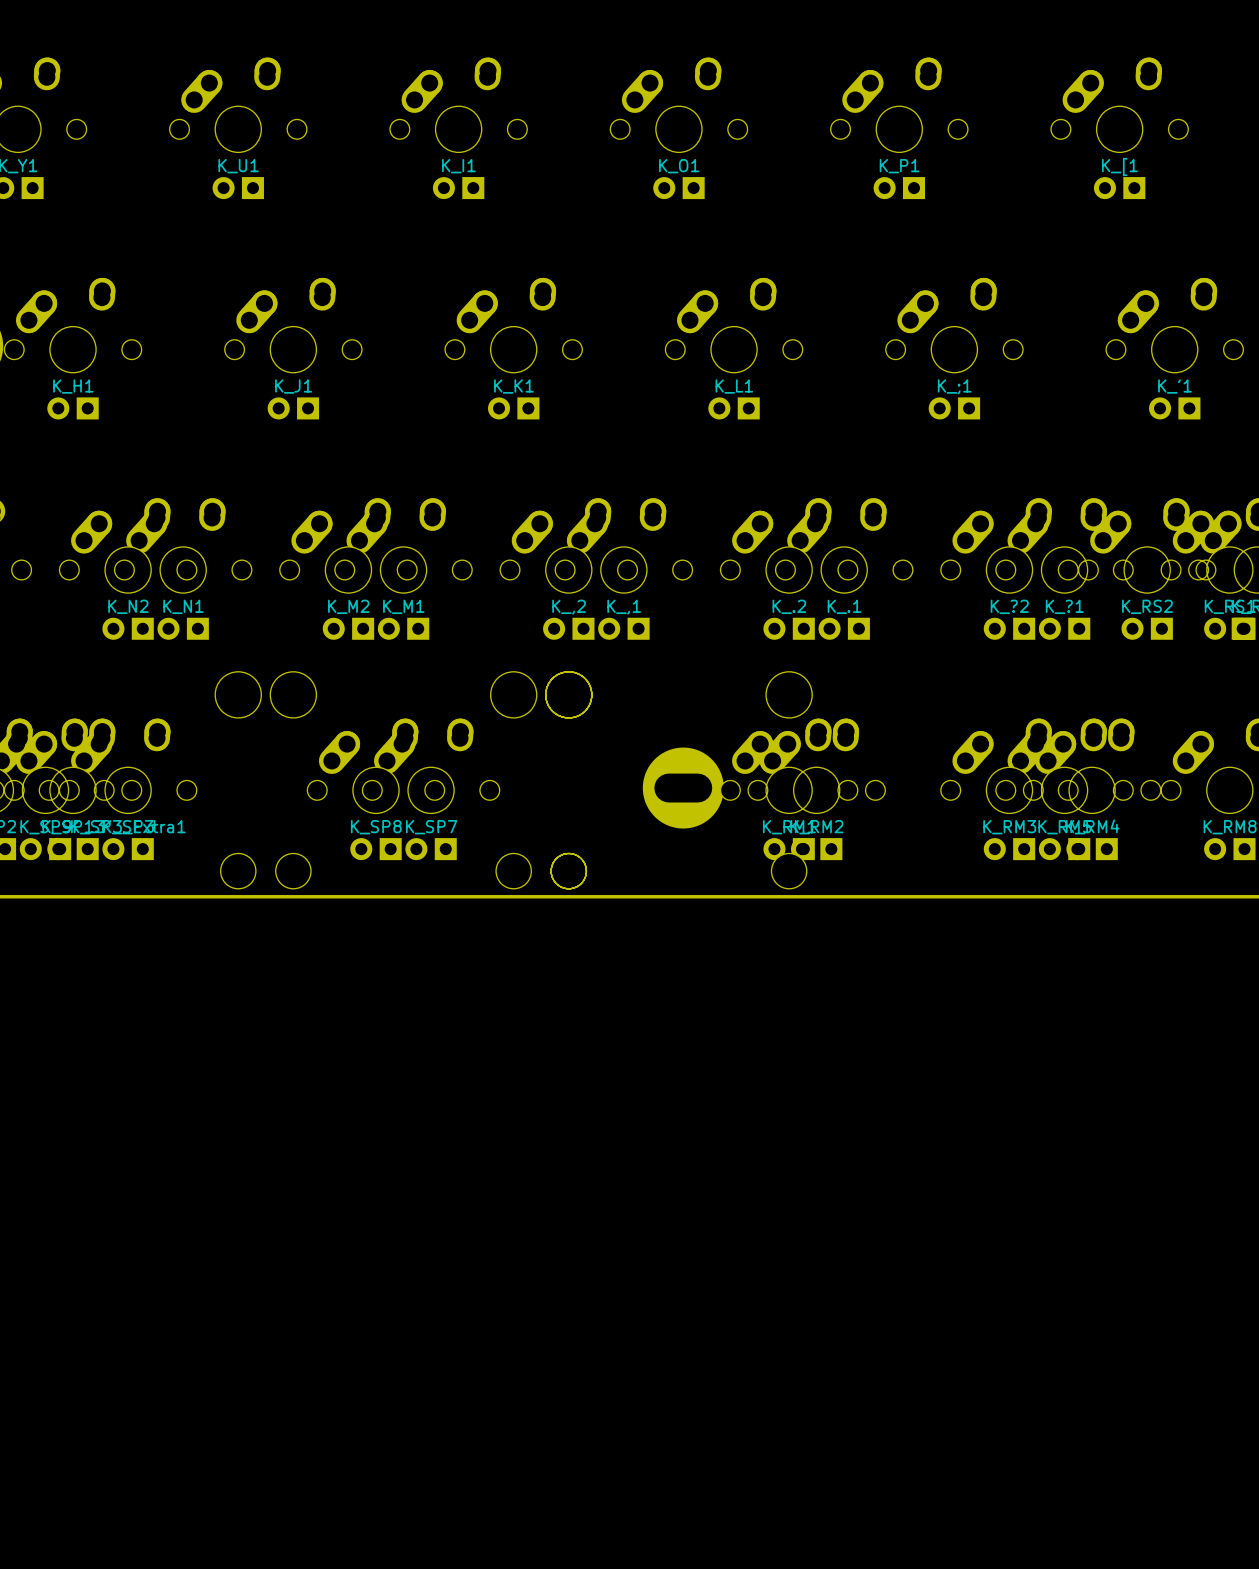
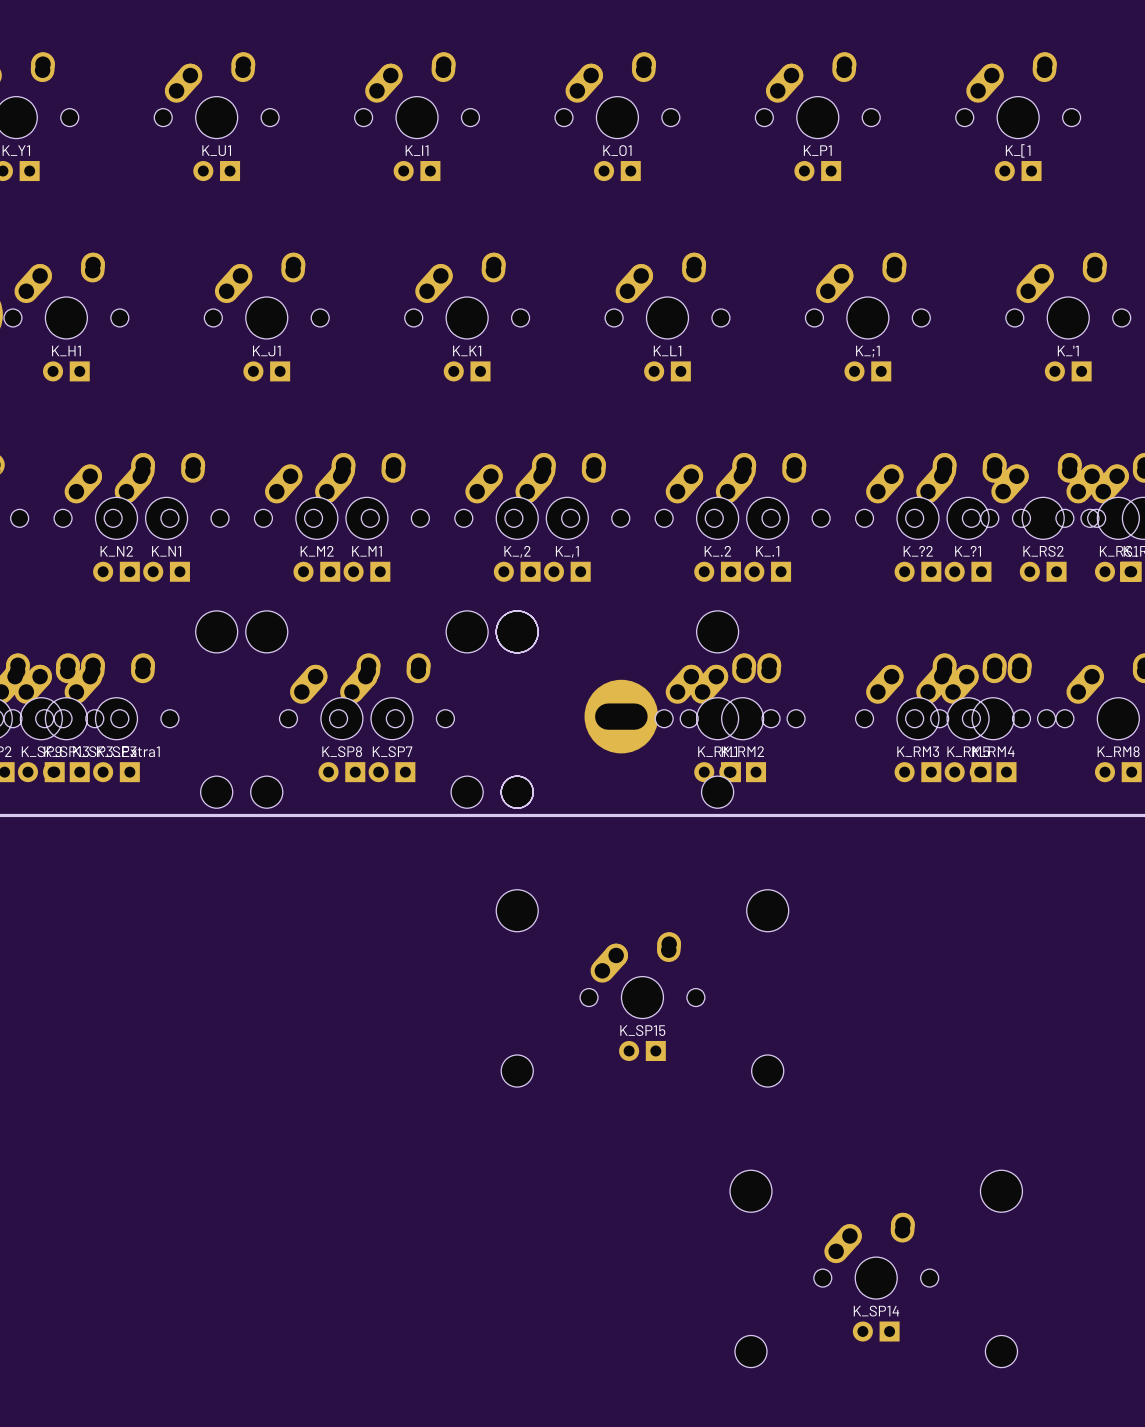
K_SP15: none -> (642, 988)
K_SP14: none -> (876, 1268)

